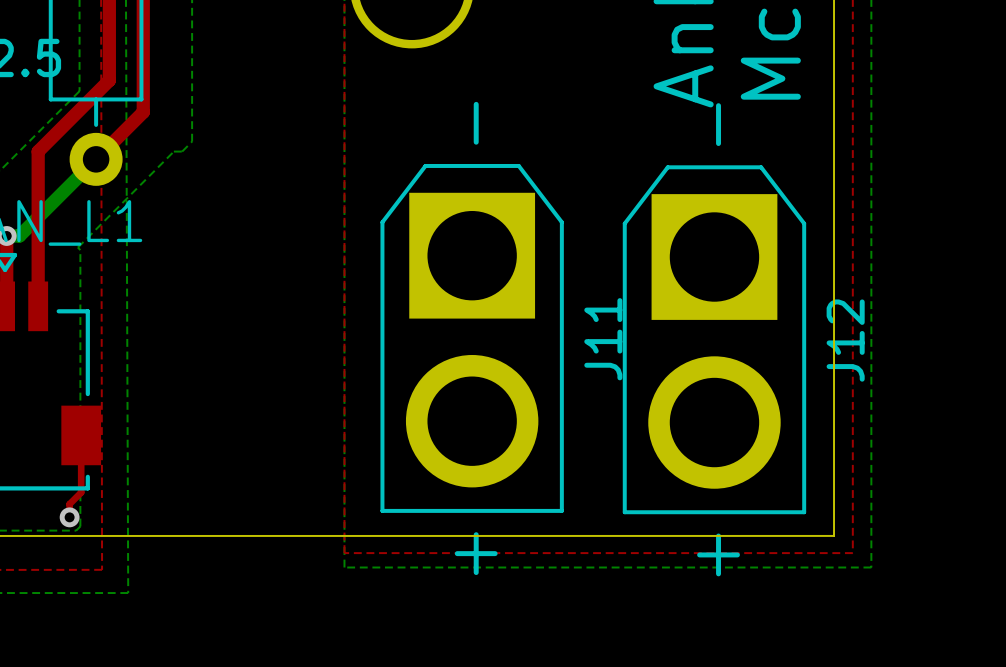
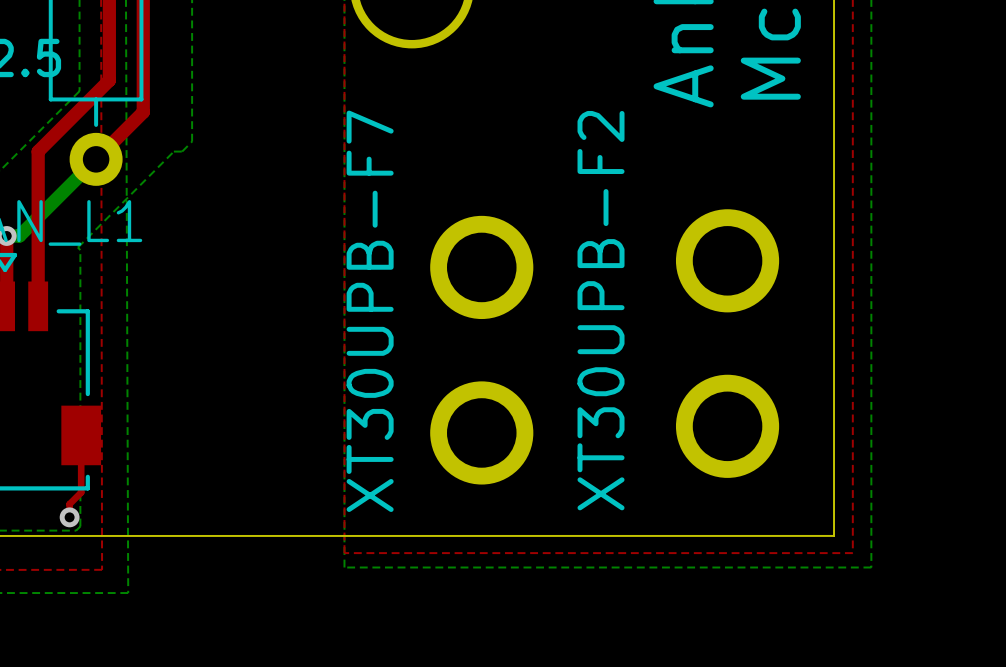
J11: (472, 338) -> none
J12: (714, 339) -> none
XT30UPB-F2: none -> (727, 343)
XT30UPB-F7: none -> (481, 350)

